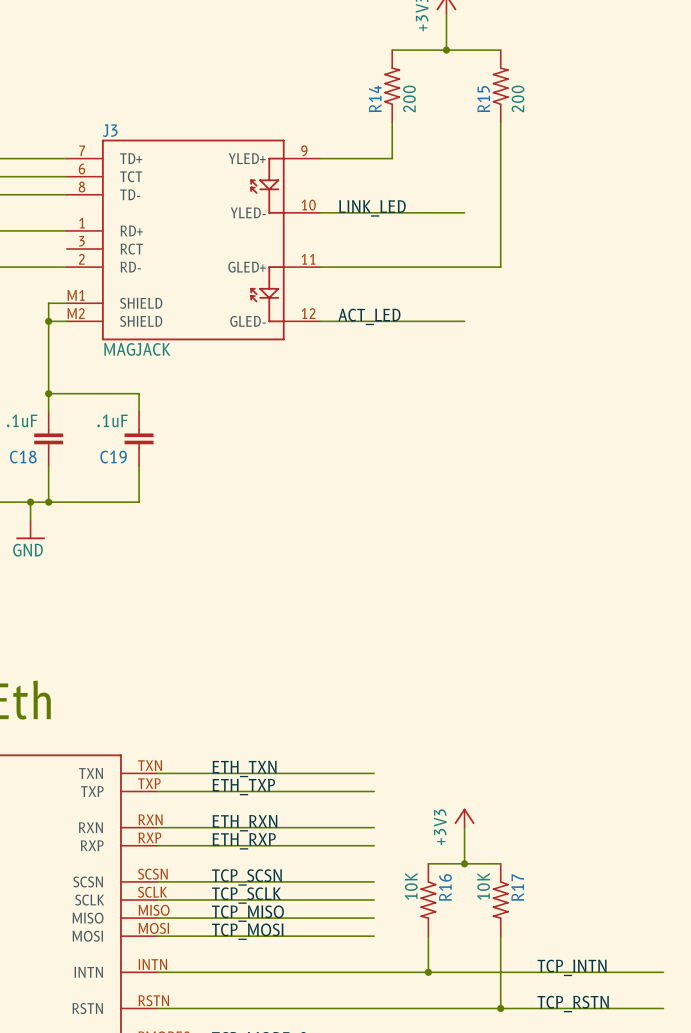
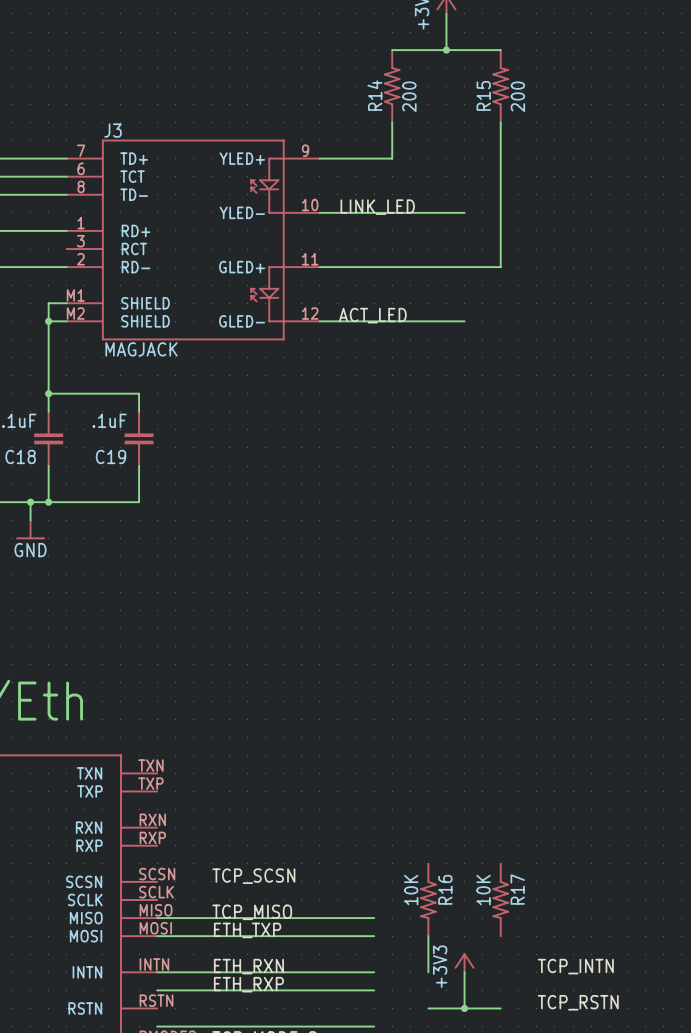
label: ETH_TXN (244, 768) -> none
wire: (157, 773) (374, 773) -> none
label: ETH_TXP (243, 787) -> none
wire: (157, 791) (374, 791) -> none
power symbol position: +3V3 (464, 818) -> +3V3 (464, 962)
label position: ETH_RXN (244, 823) -> ETH_RXN (248, 966)
wire: (157, 827) (374, 827) -> none
wire: (464, 827) (464, 863) -> (464, 972) (464, 1008)
label position: ETH_RXP (244, 841) -> ETH_RXP (248, 984)
wire: (157, 845) (374, 845) -> (157, 990) (374, 990)
wire: (428, 863) (500, 863) -> none
junction: (464, 863) -> none
wire: (157, 881) (374, 881) -> (157, 1026) (374, 1026)
label: TCP_SCLK (246, 895) -> none
wire: (157, 899) (374, 899) -> none
label: TCP_MOSI (247, 931) -> ETH_TXP (247, 930)
wire: (500, 936) (500, 1008) (663, 1008) -> none
wire: (374, 972) (663, 972) -> none
junction: (428, 972) -> none
wire: (157, 1008) (428, 1008) -> none
junction: none -> (464, 1008)
junction: (500, 1008) -> none

